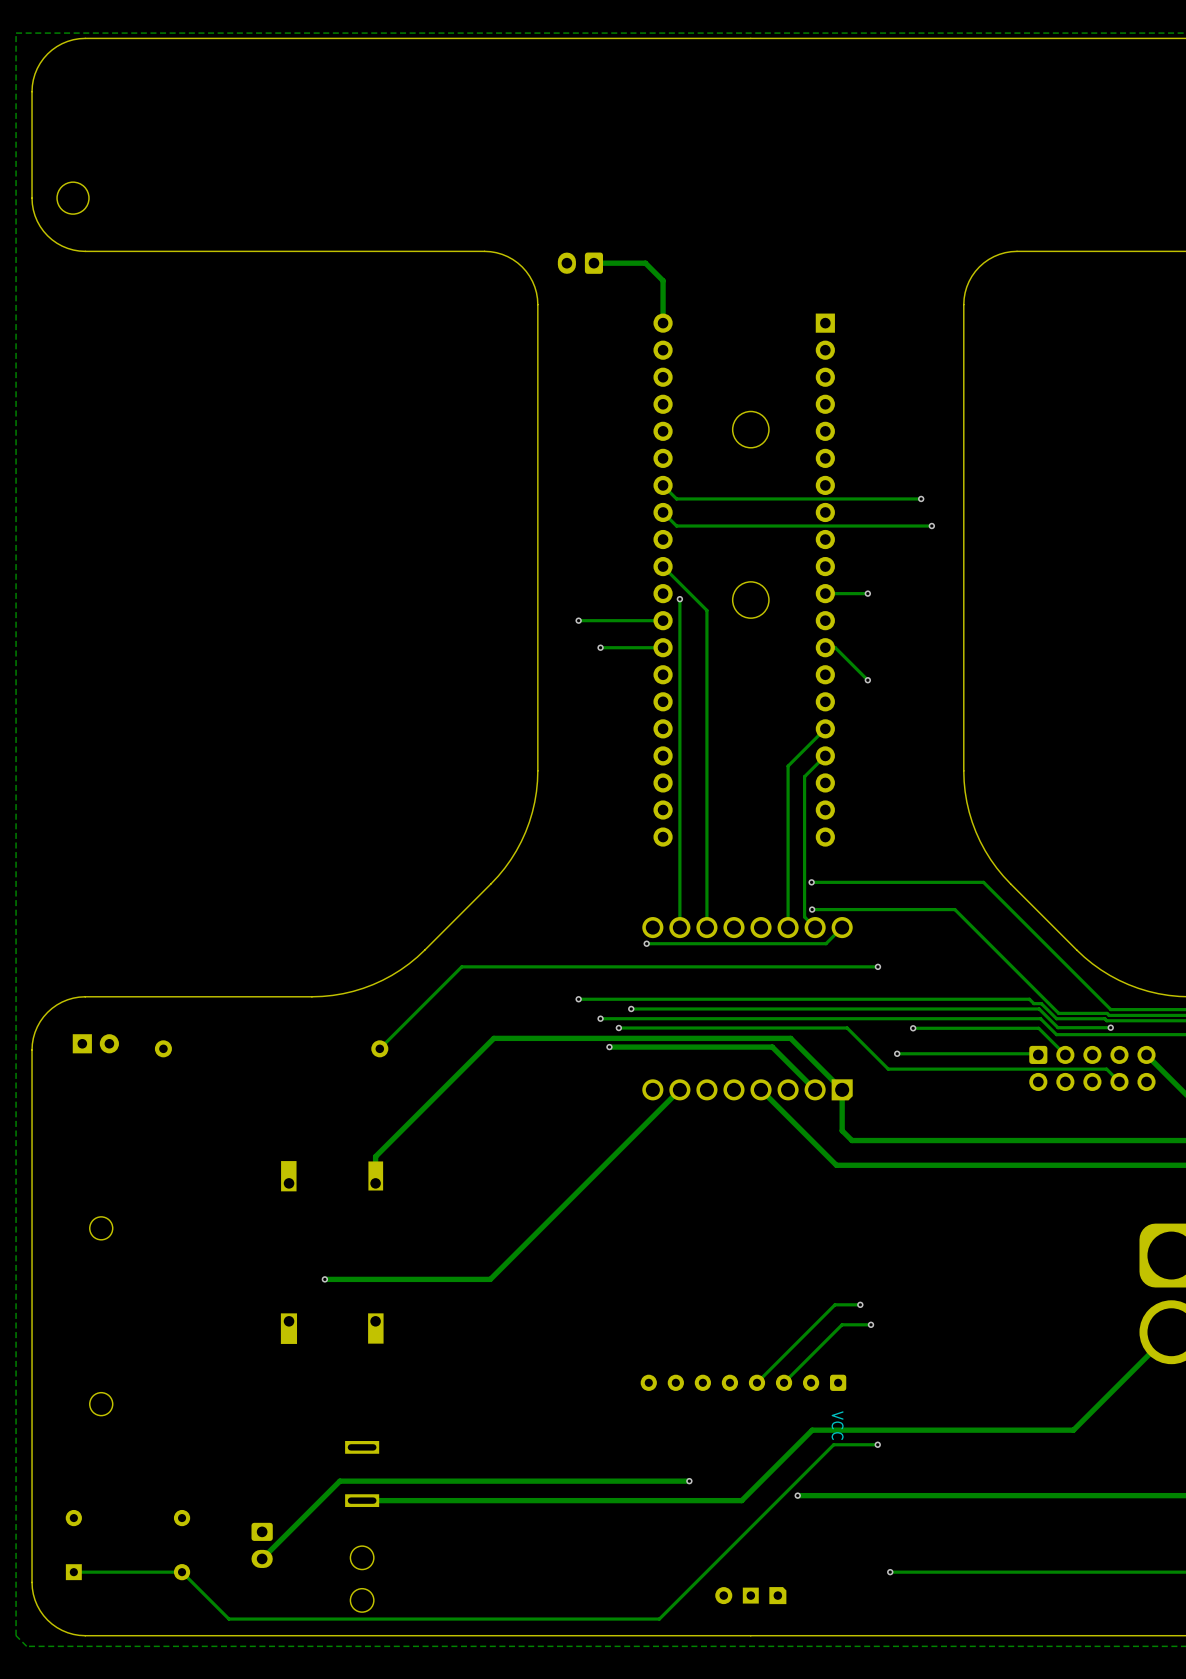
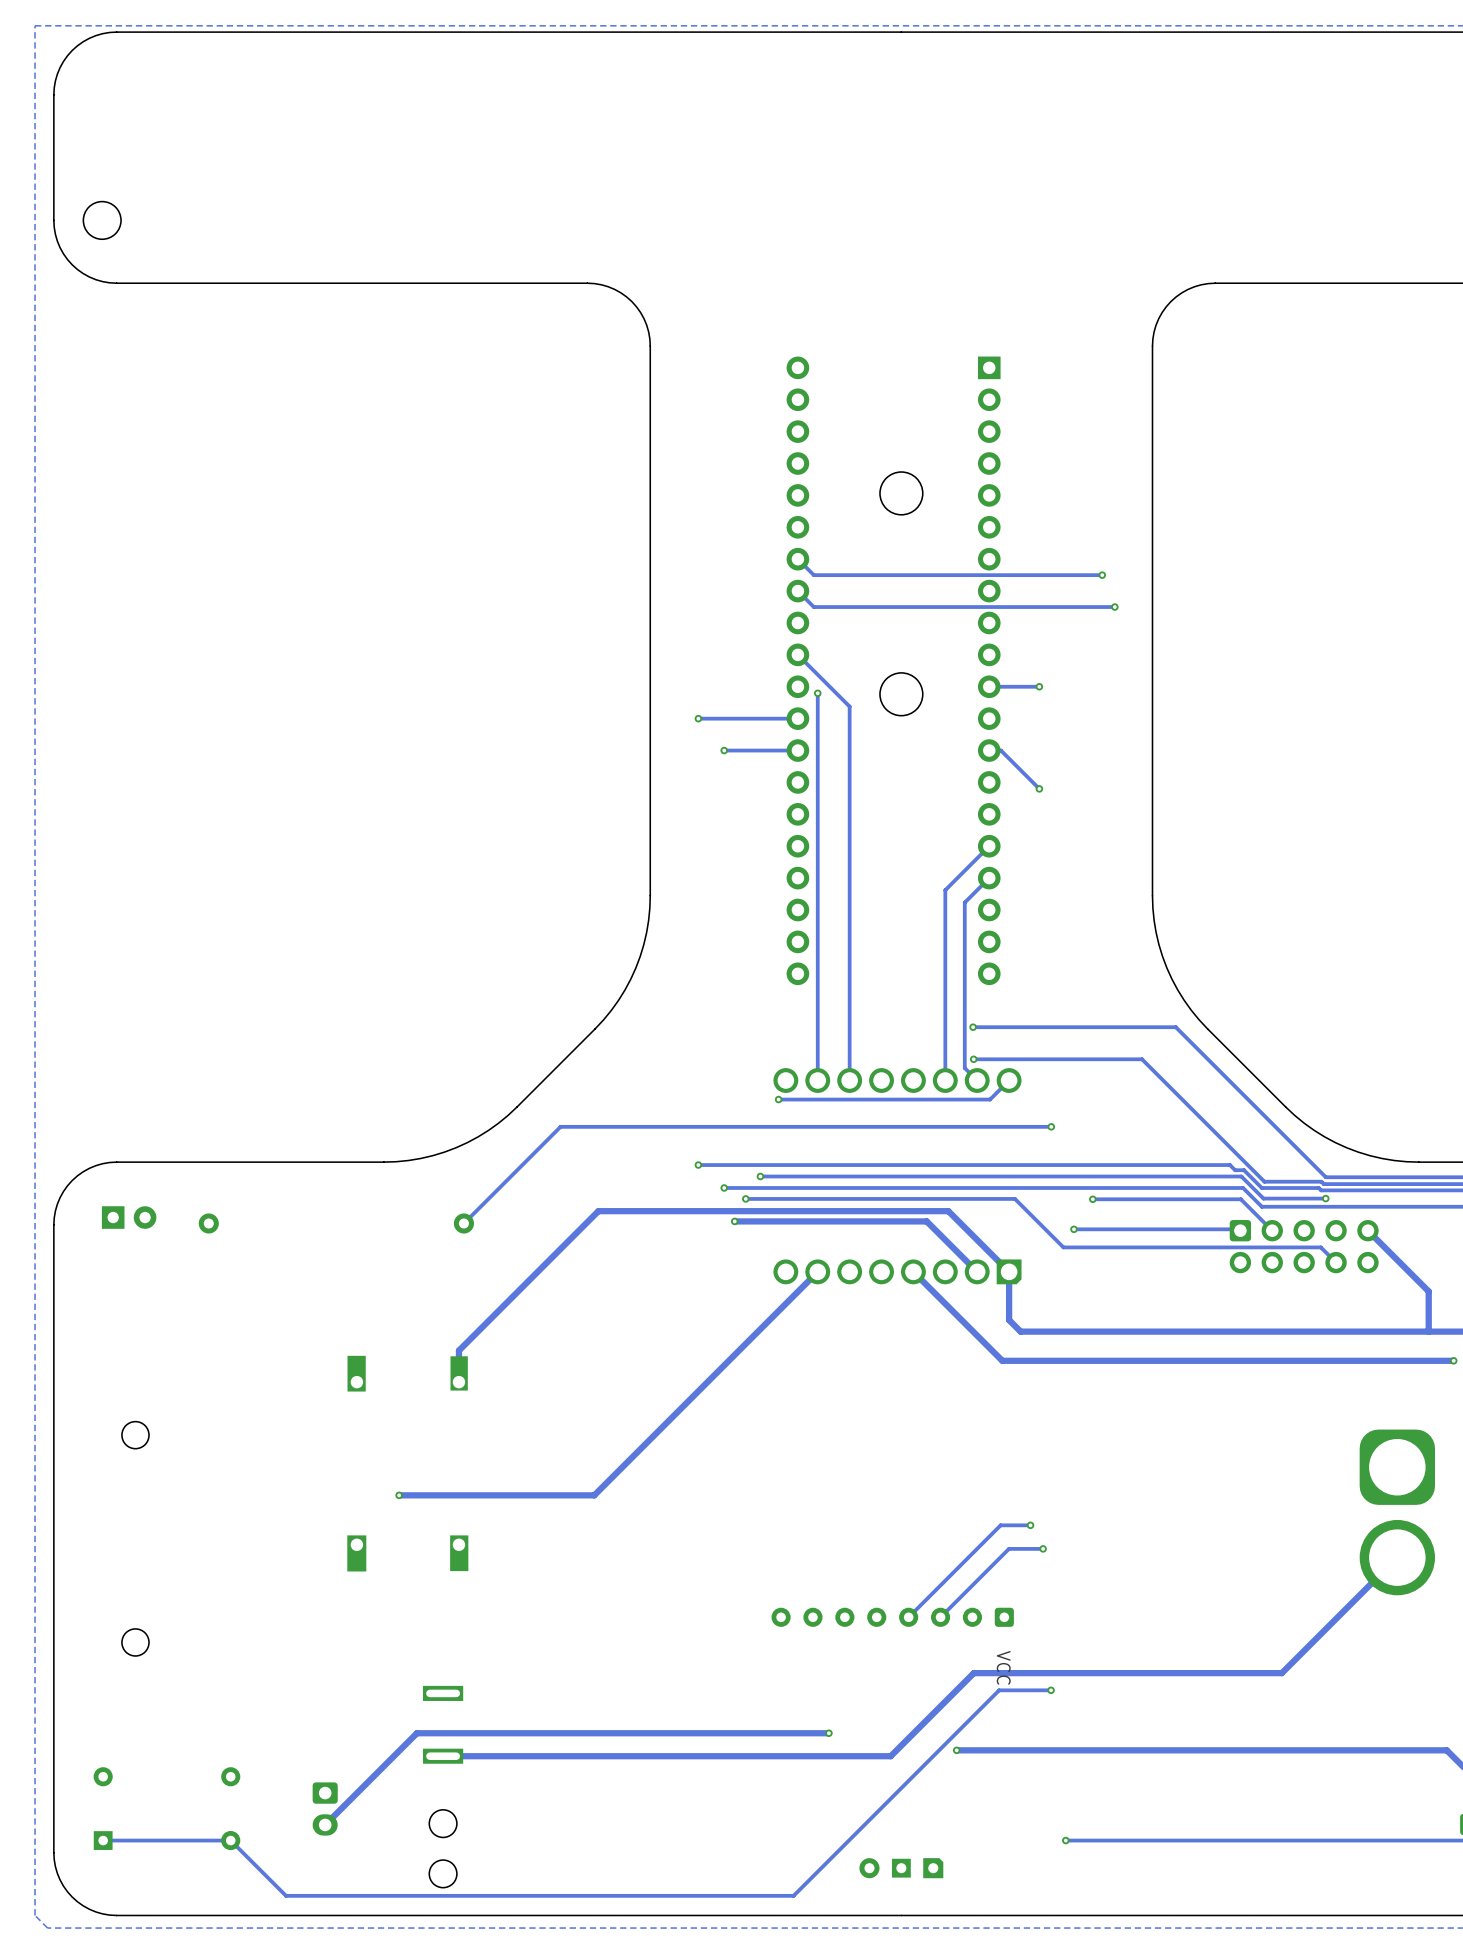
part: (580, 263) -> none
track: (593, 263) (645, 263) (663, 280) (663, 323) -> none

